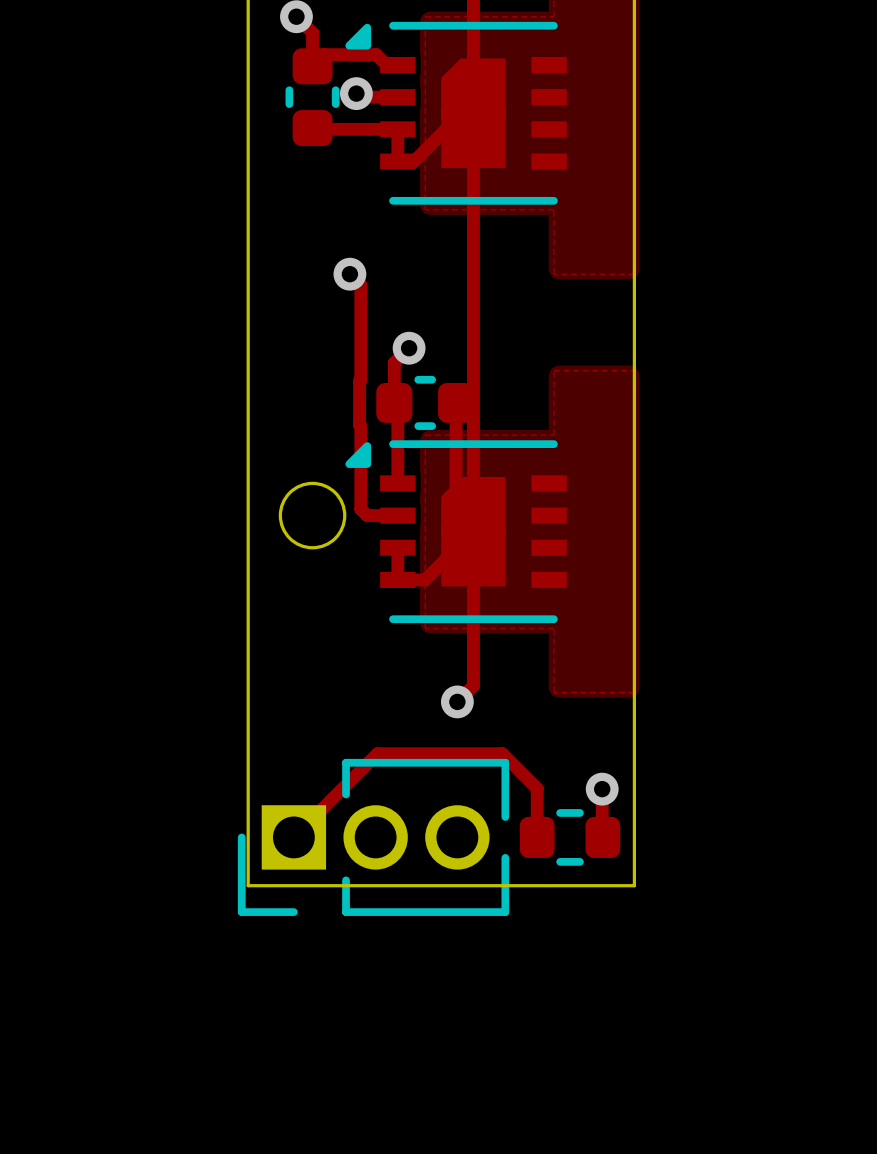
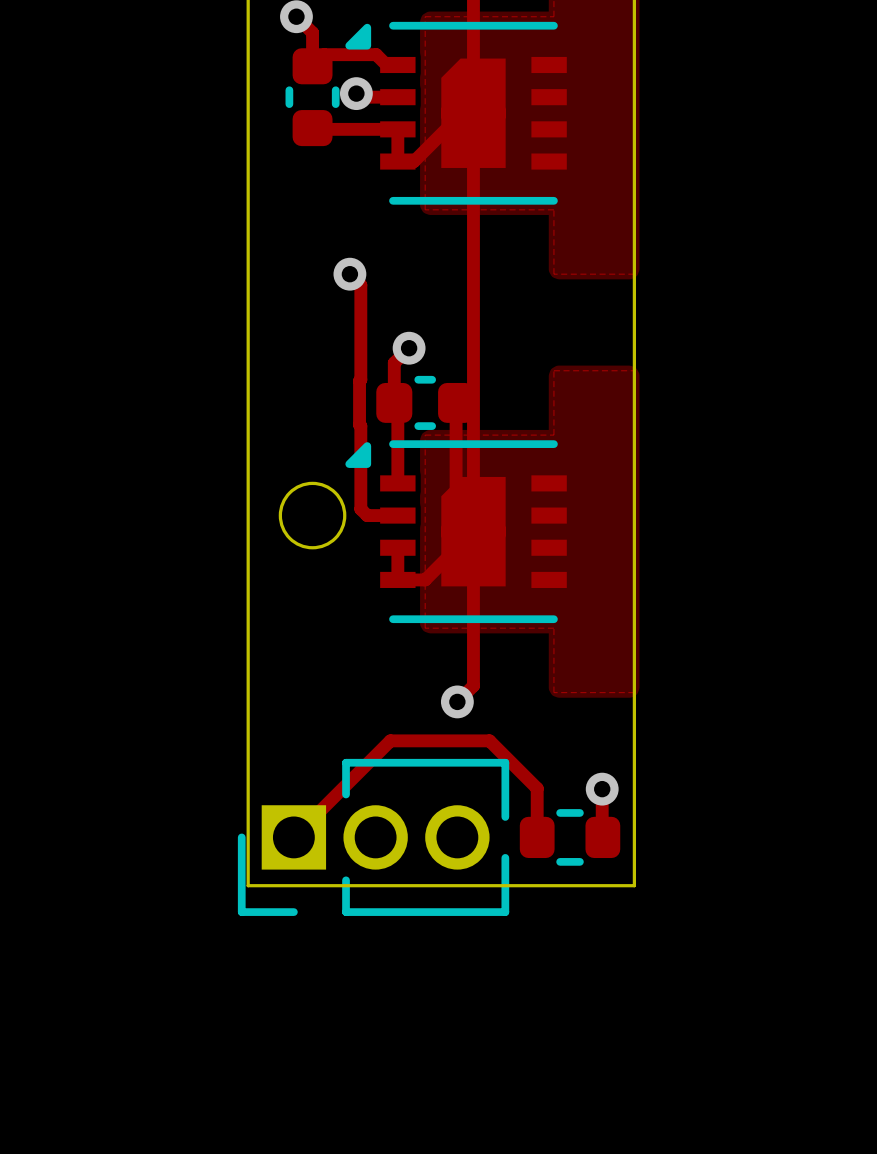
track: (377, 753) (502, 753) -> (377, 753) (390, 740) (489, 740) (502, 753)

